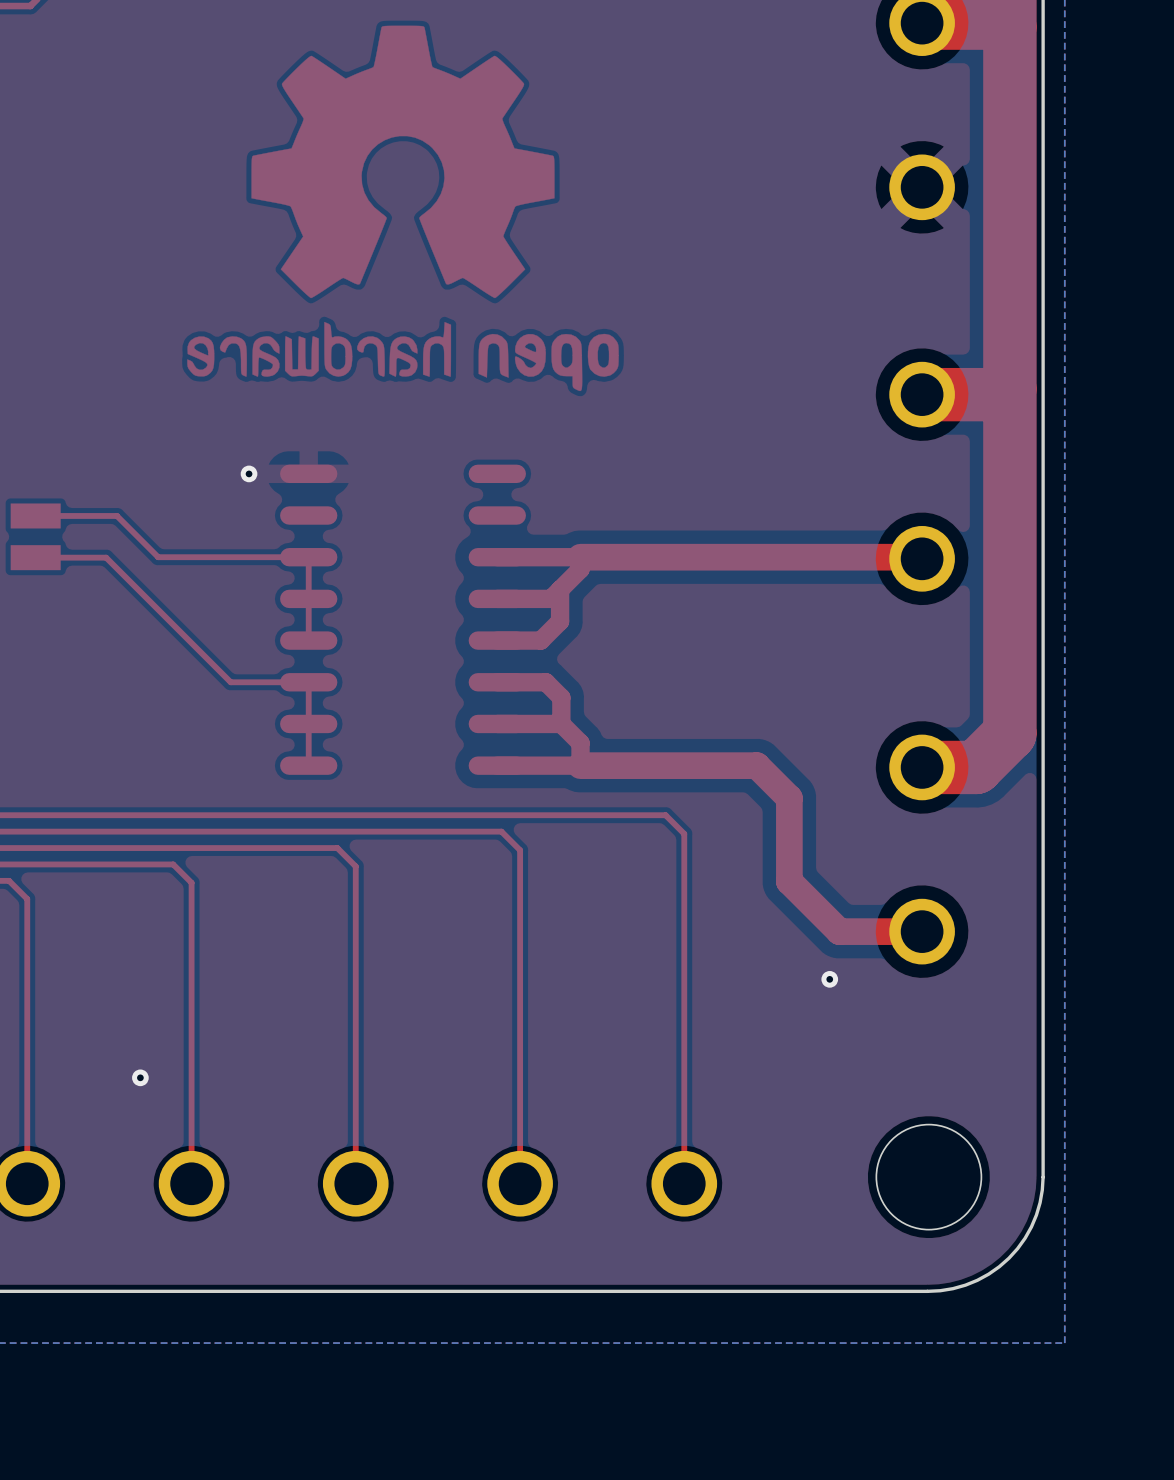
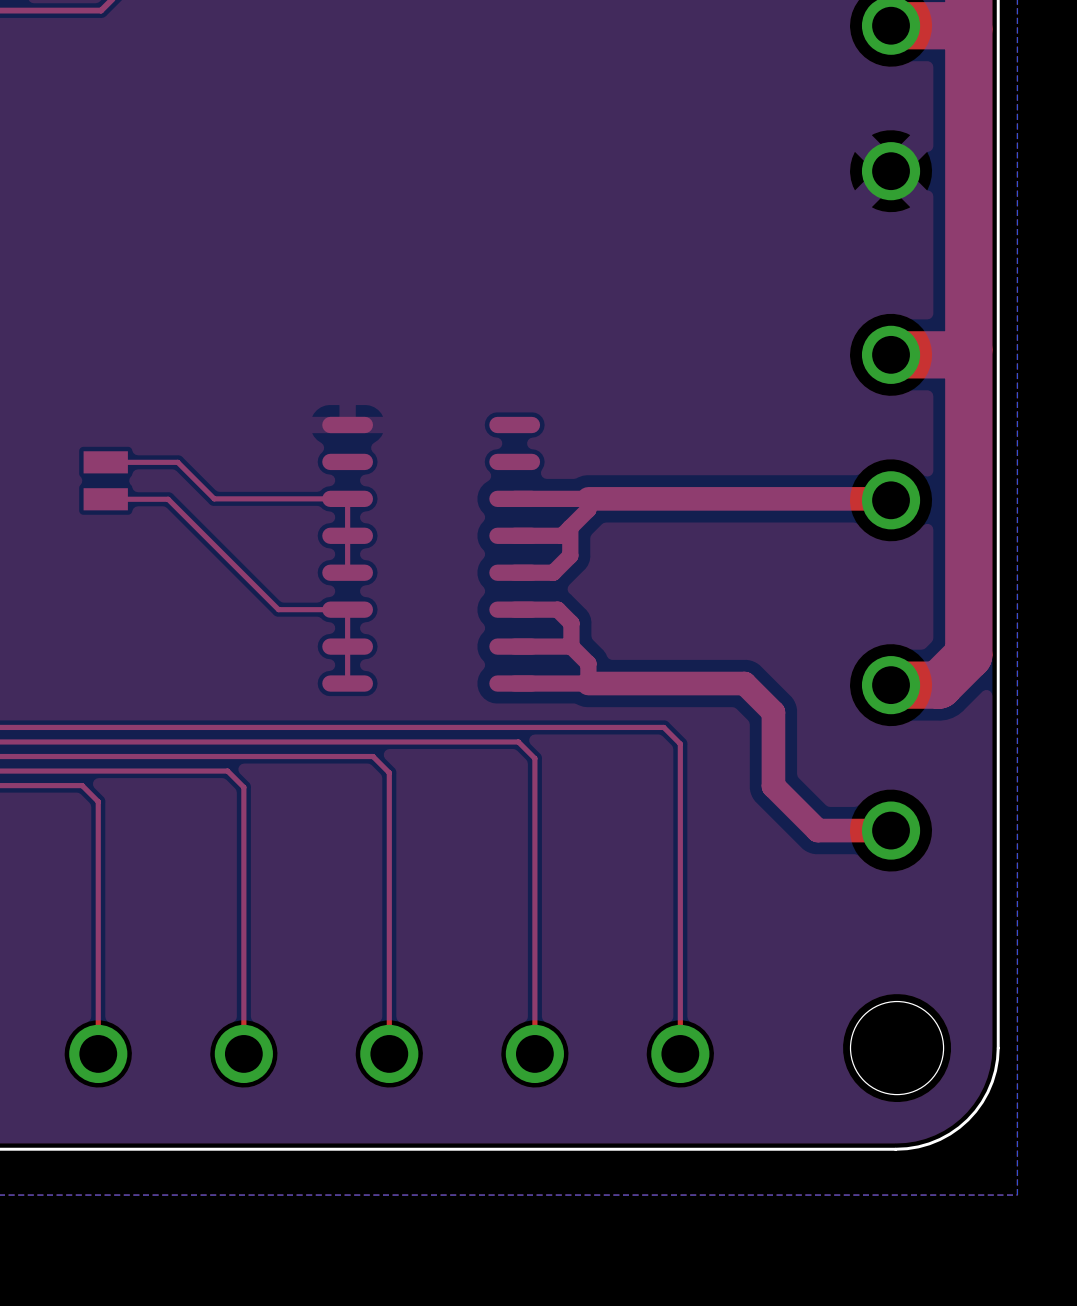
drawing: [187, 25, 619, 392] -> none
via: (249, 473) -> none
via: (829, 979) -> none
via: (140, 1077) -> none

